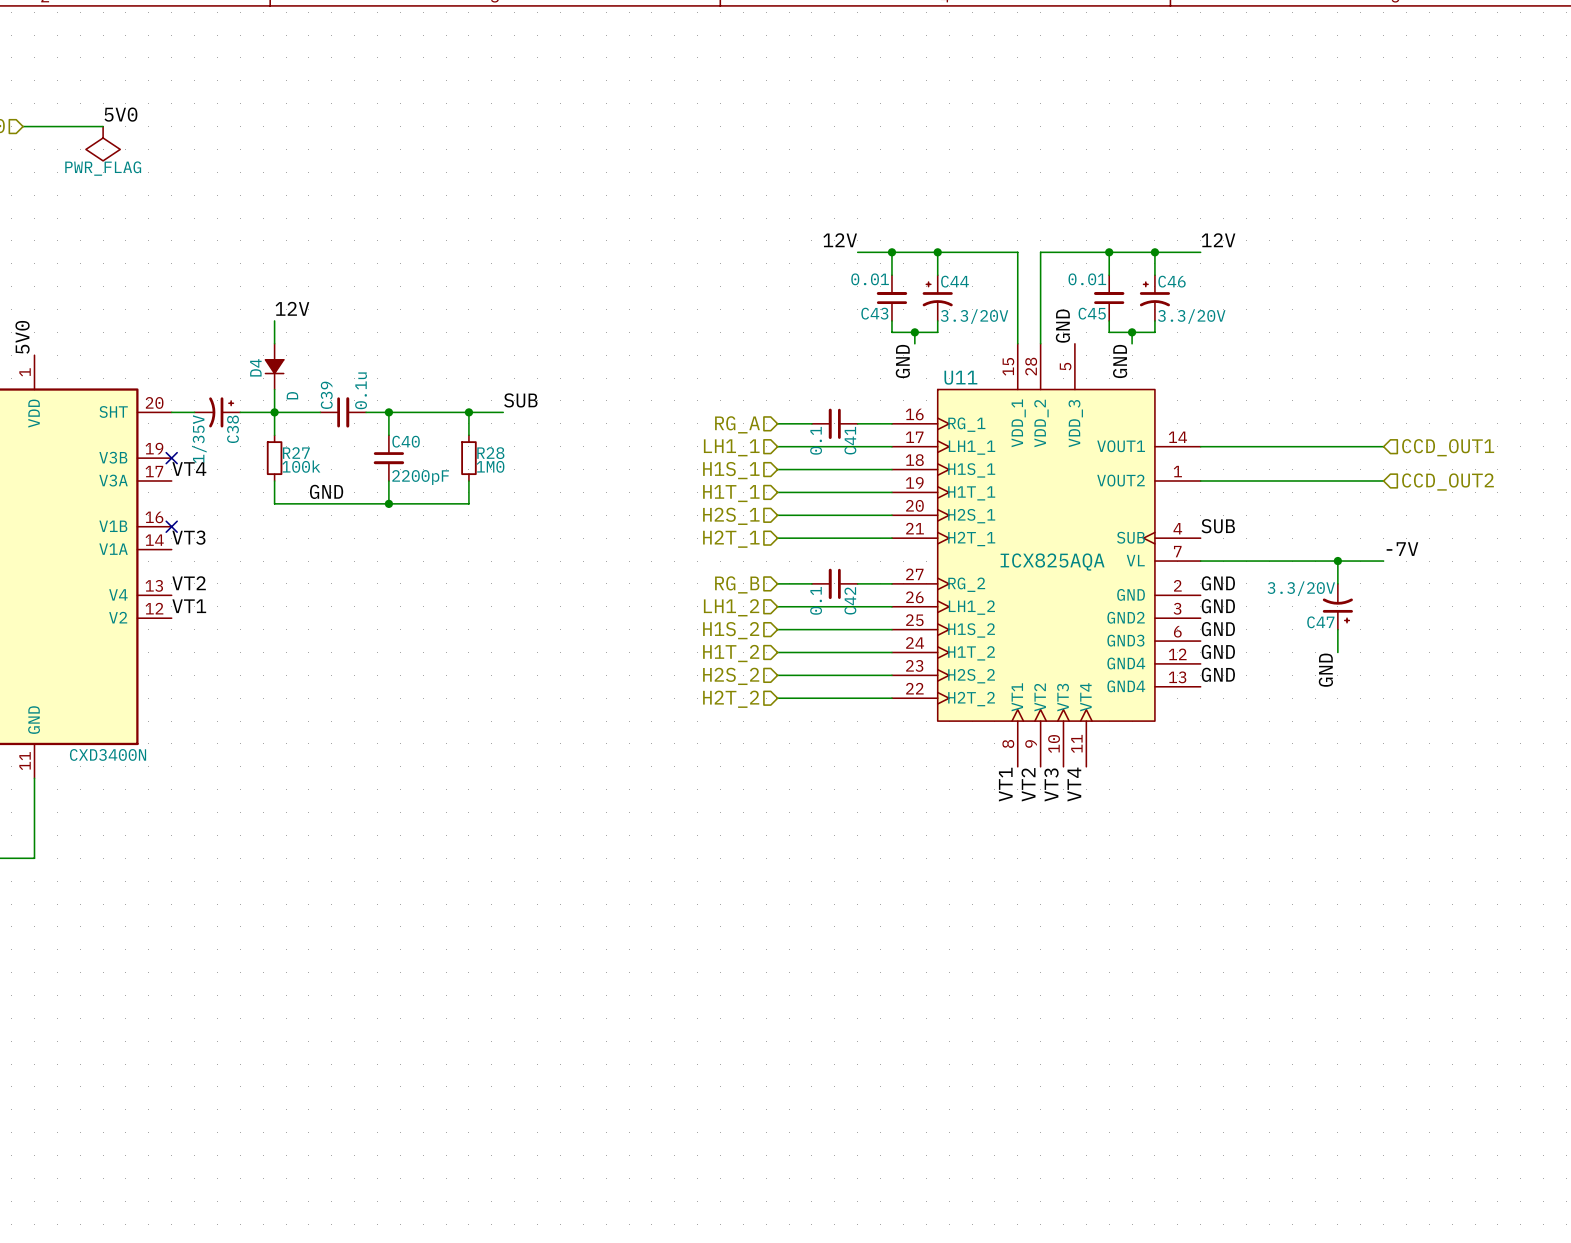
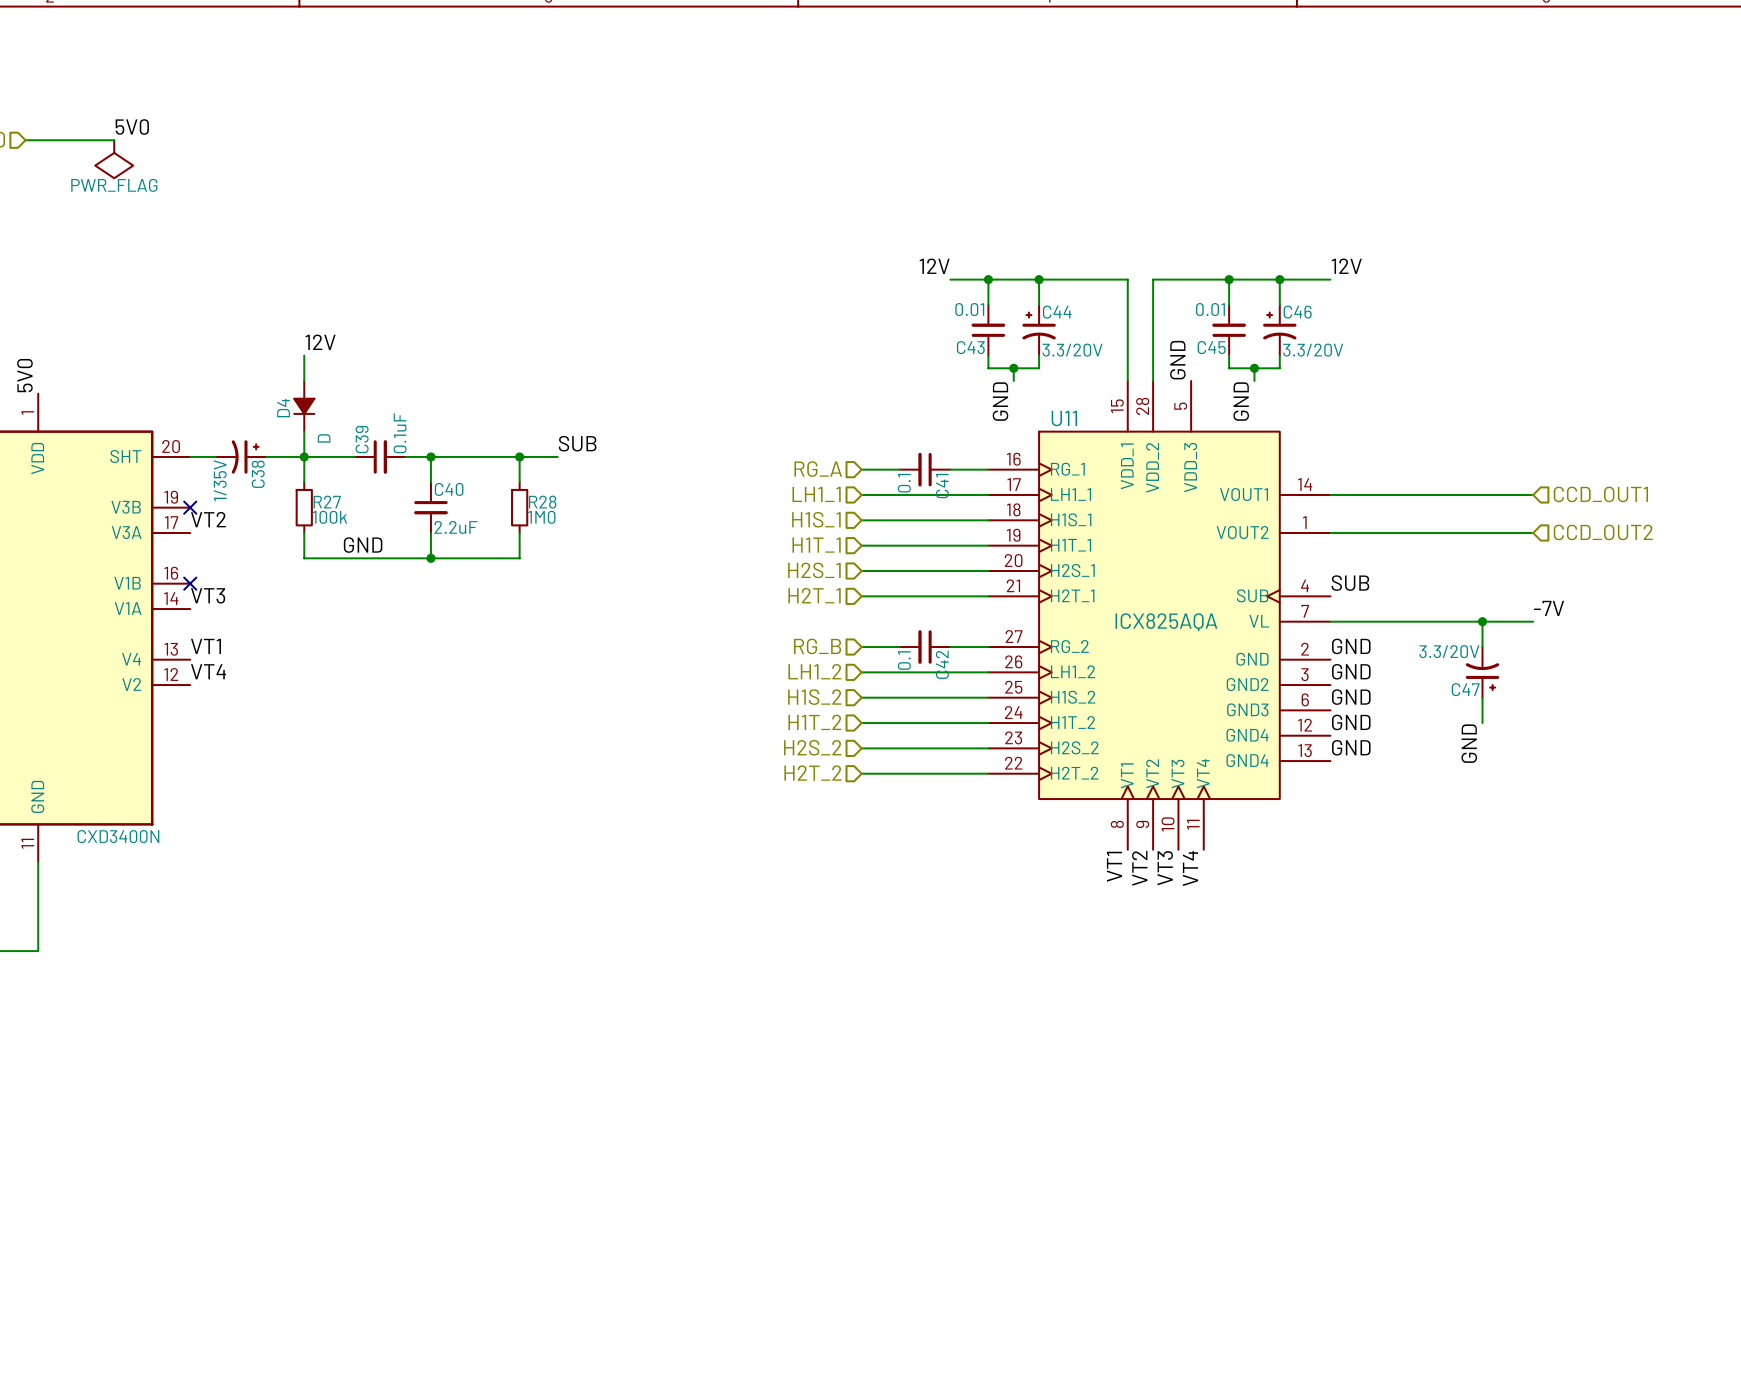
C39 value: 0.1u (361, 390) -> 0.1uF (400, 433)
label: VT4 (189, 469) -> VT2 (208, 519)
C40 value: 2200pF (420, 477) -> 2.2uF (456, 527)
label: VT2 (189, 583) -> VT1 (205, 646)
label: VT1 (189, 606) -> VT4 (208, 671)

